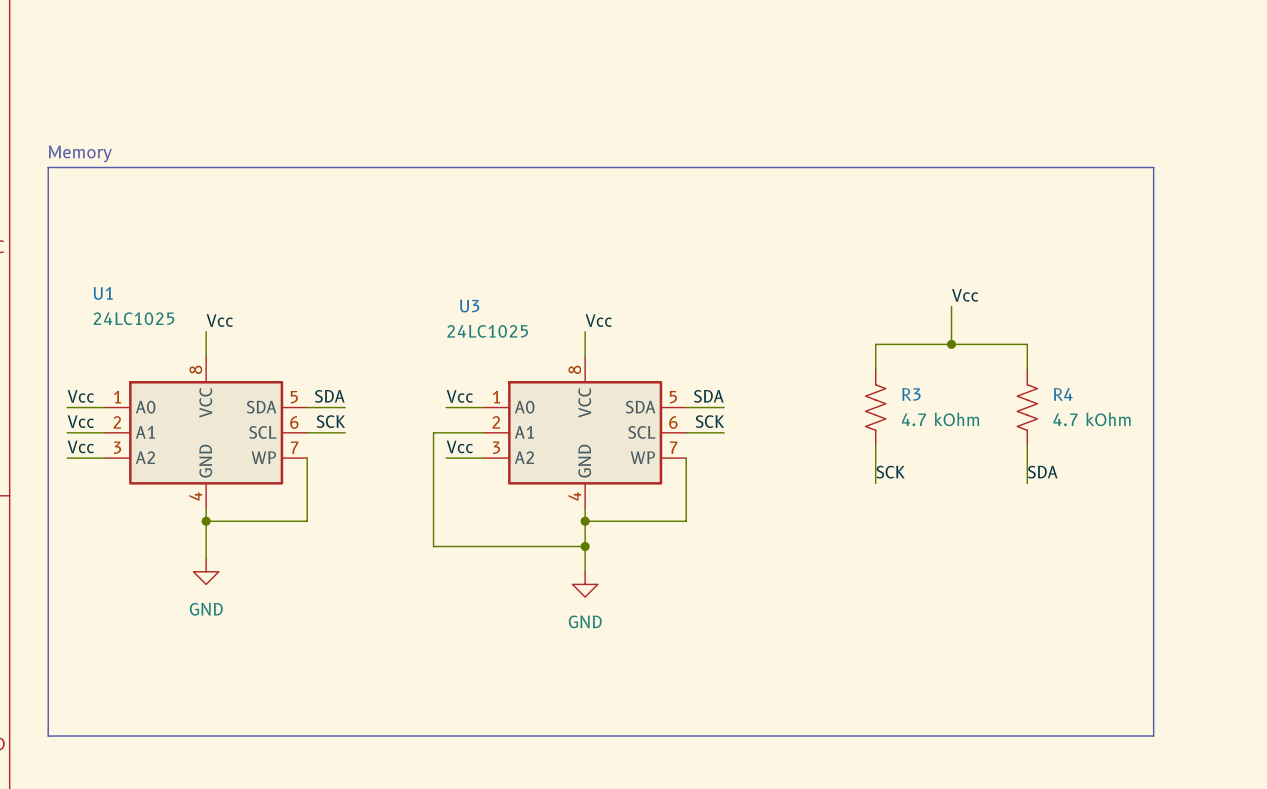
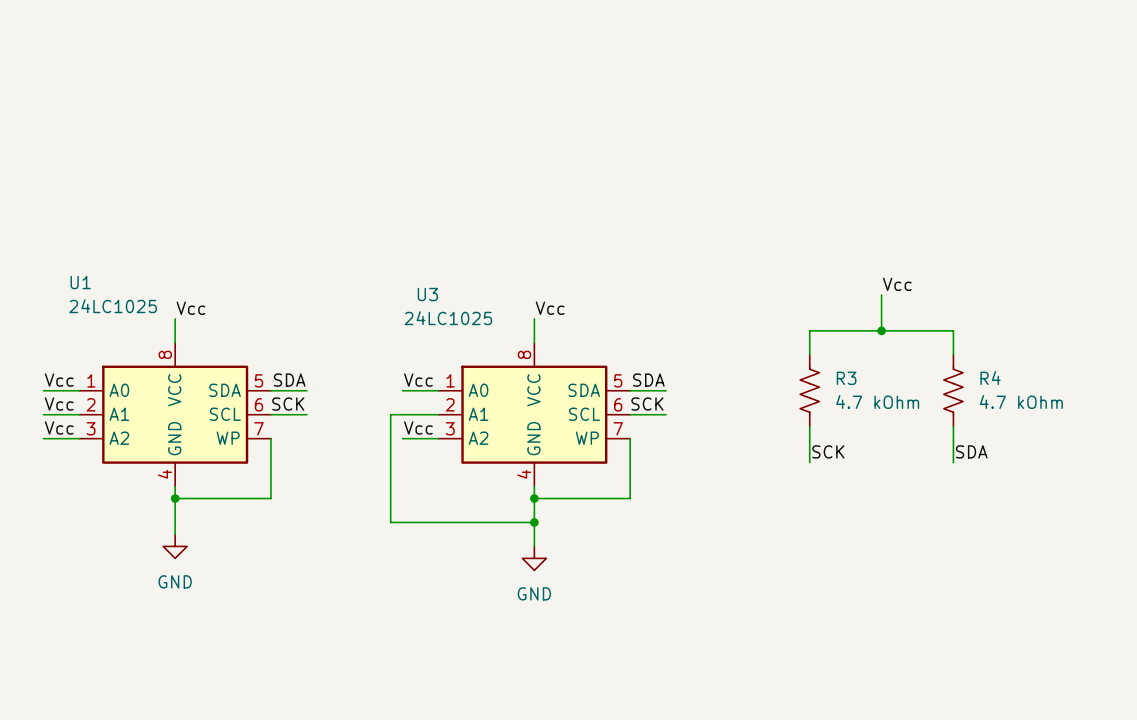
text: Memory (80, 153) -> none
line: (48, 167) (1153, 167) (1153, 736) (48, 736) (48, 167) -> none

